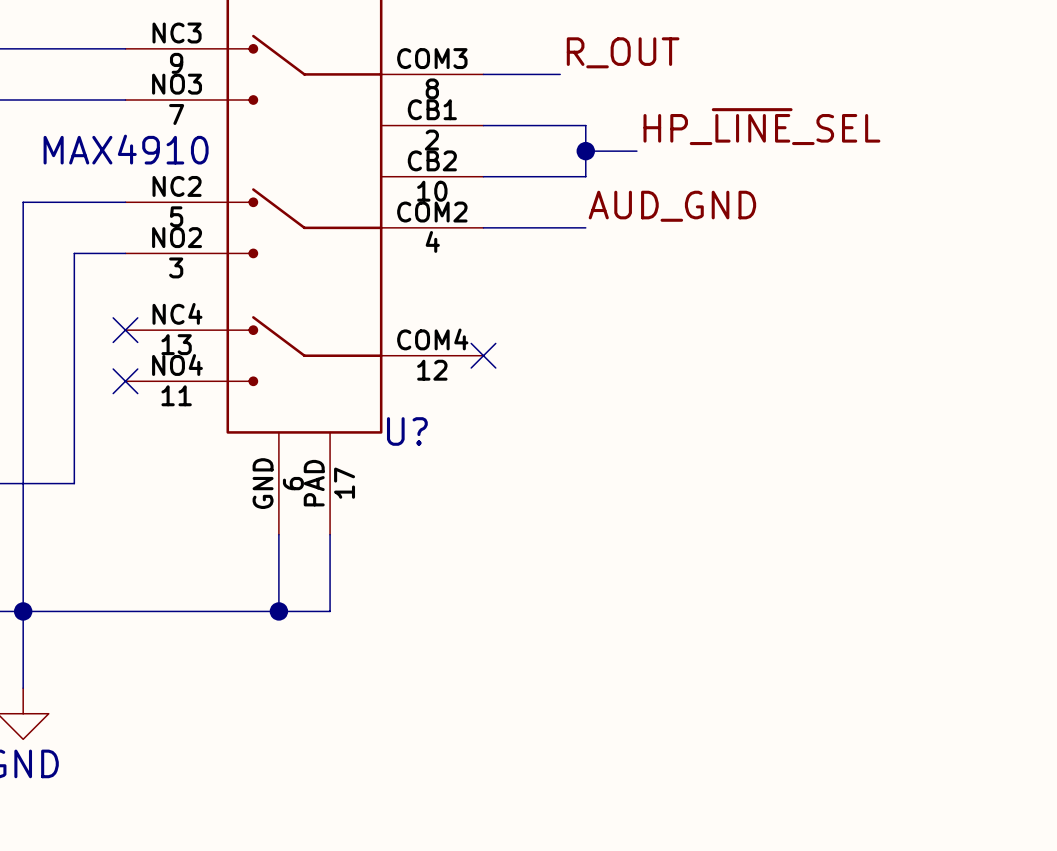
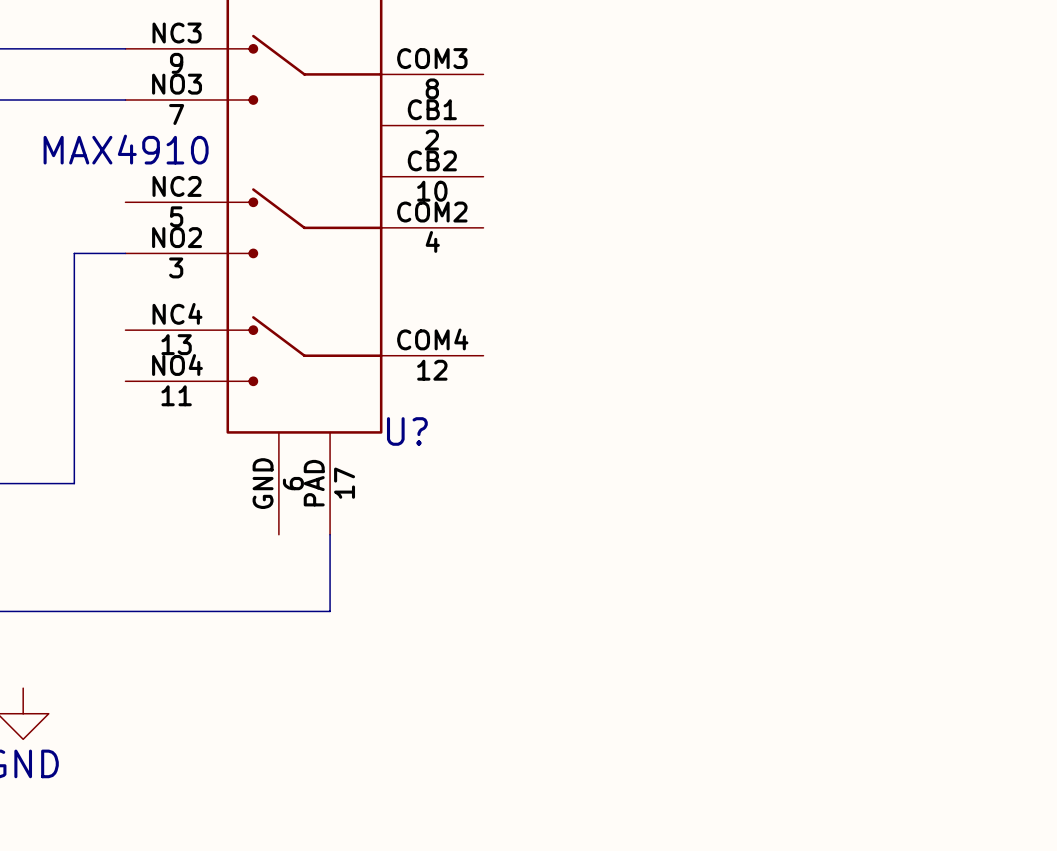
label: R_OUT (623, 52) -> none
wire: (483, 74) (560, 74) -> none
wire: (483, 125) (585, 125) (585, 176) (483, 176) -> none
label: HP_~{LINE}_SEL (761, 126) -> none
wire: (585, 151) (636, 151) -> none
junction: (585, 151) -> none
wire: (125, 202) (23, 202) (23, 688) -> none
label: AUD_GND (672, 206) -> none
wire: (483, 227) (585, 227) -> none
no-connect mark: (125, 330) -> none
no-connect mark: (483, 355) -> none
no-connect mark: (125, 381) -> none
wire: (278, 534) (278, 611) -> none
junction: (23, 611) -> none
junction: (278, 611) -> none

